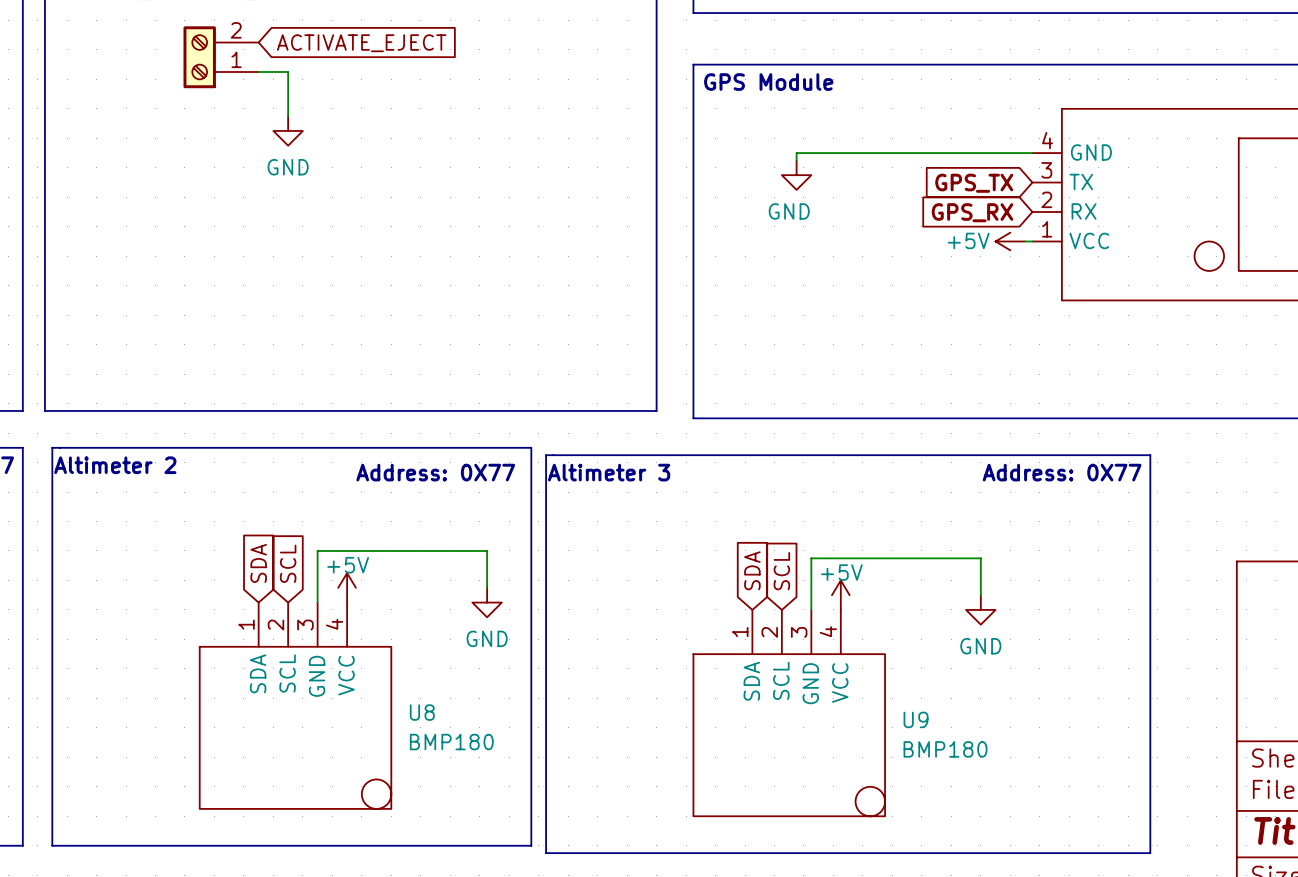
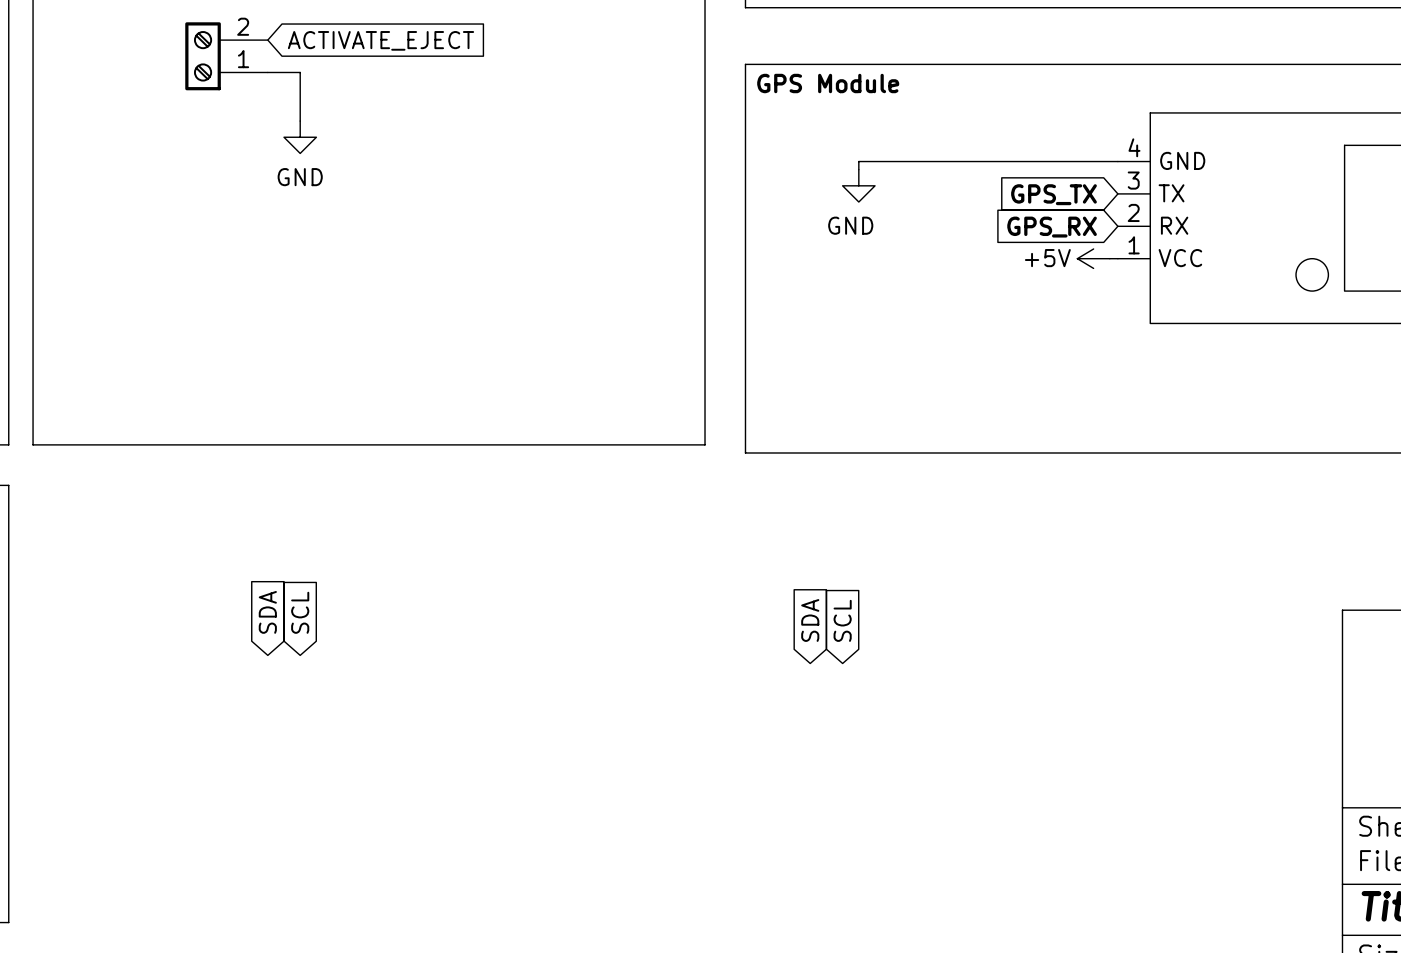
line: (52, 447) (52, 845) (531, 845) (531, 447) (52, 447) -> none
line: (546, 455) (1150, 455) (1150, 853) (546, 853) (546, 455) -> none
text: Altimeter 2 (115, 465) -> none
text: Address: 0X77 (435, 472) -> none
text: Altimeter 3 (609, 472) -> none
text: Address: 0X77 (1062, 472) -> none
power symbol: +5V (347, 587) -> none
wire: (487, 587) (487, 550) (317, 550) (317, 602) -> none
power symbol: +5V (840, 595) -> none
wire: (980, 595) (980, 558) (811, 558) (811, 609) -> none
power symbol: GND (487, 602) -> none
power symbol: GND (980, 609) -> none
U8: BMP180 (295, 705) -> none
U9: BMP180 (789, 713) -> none

